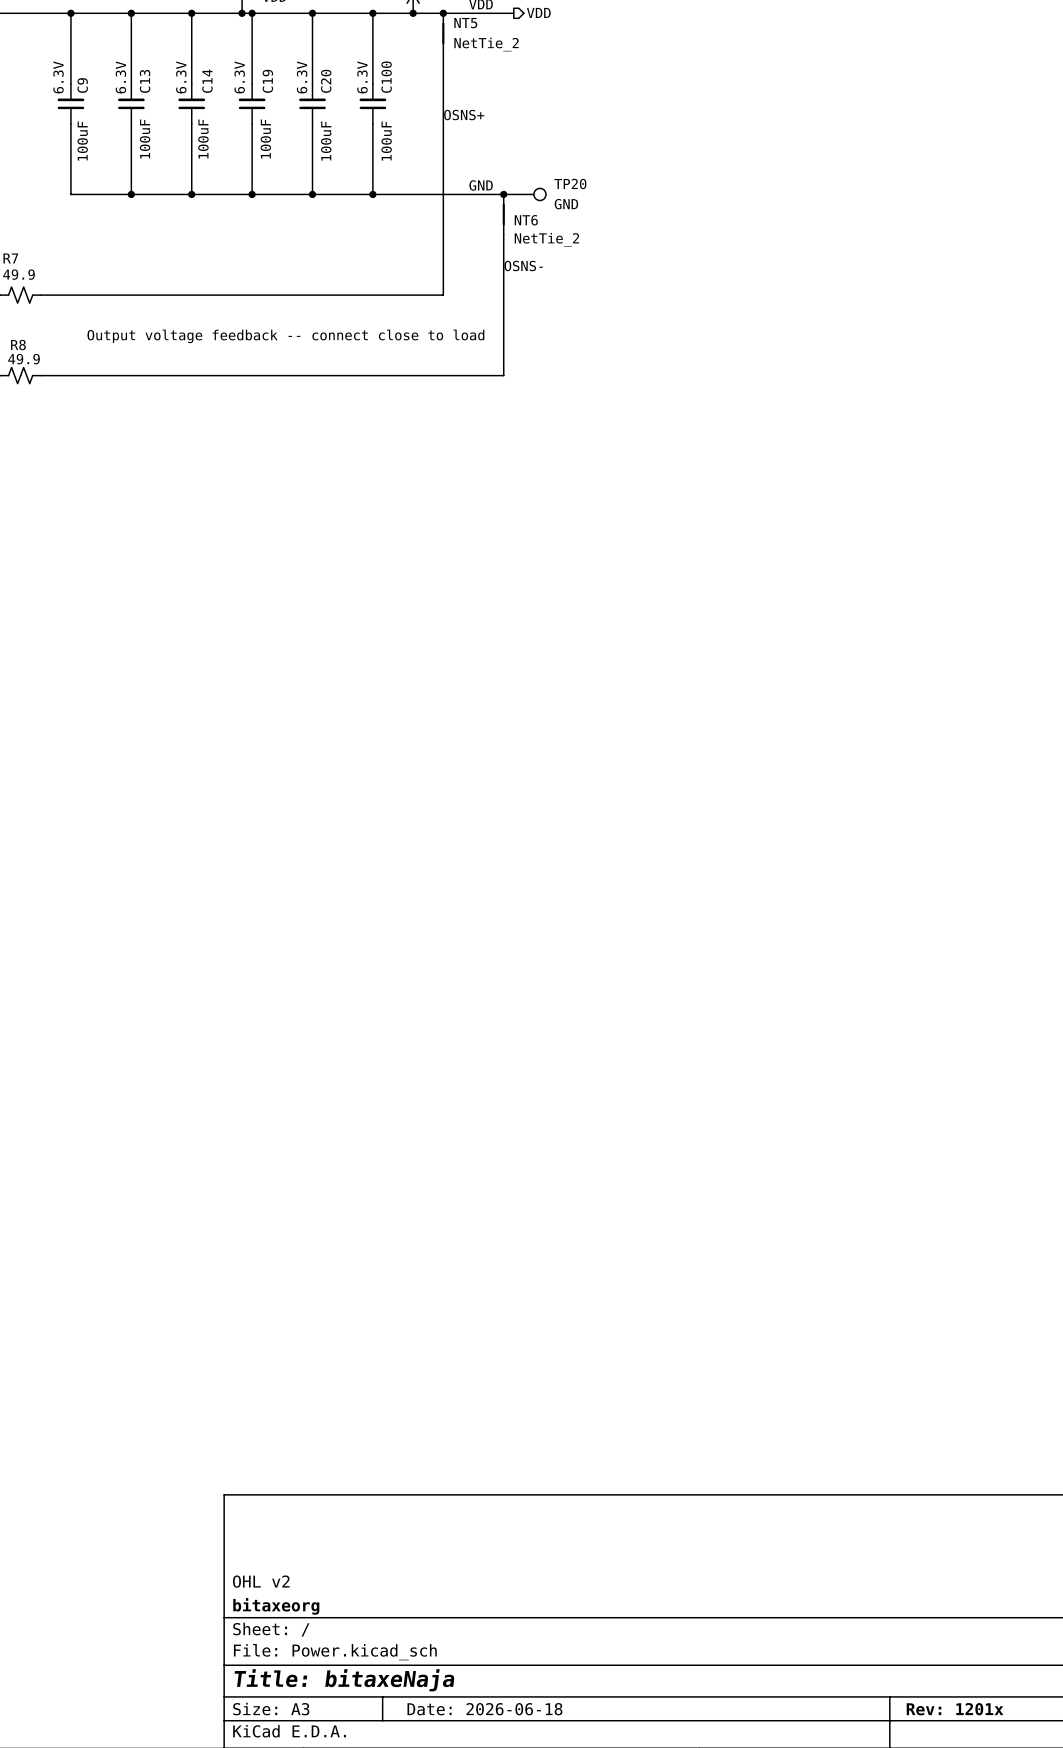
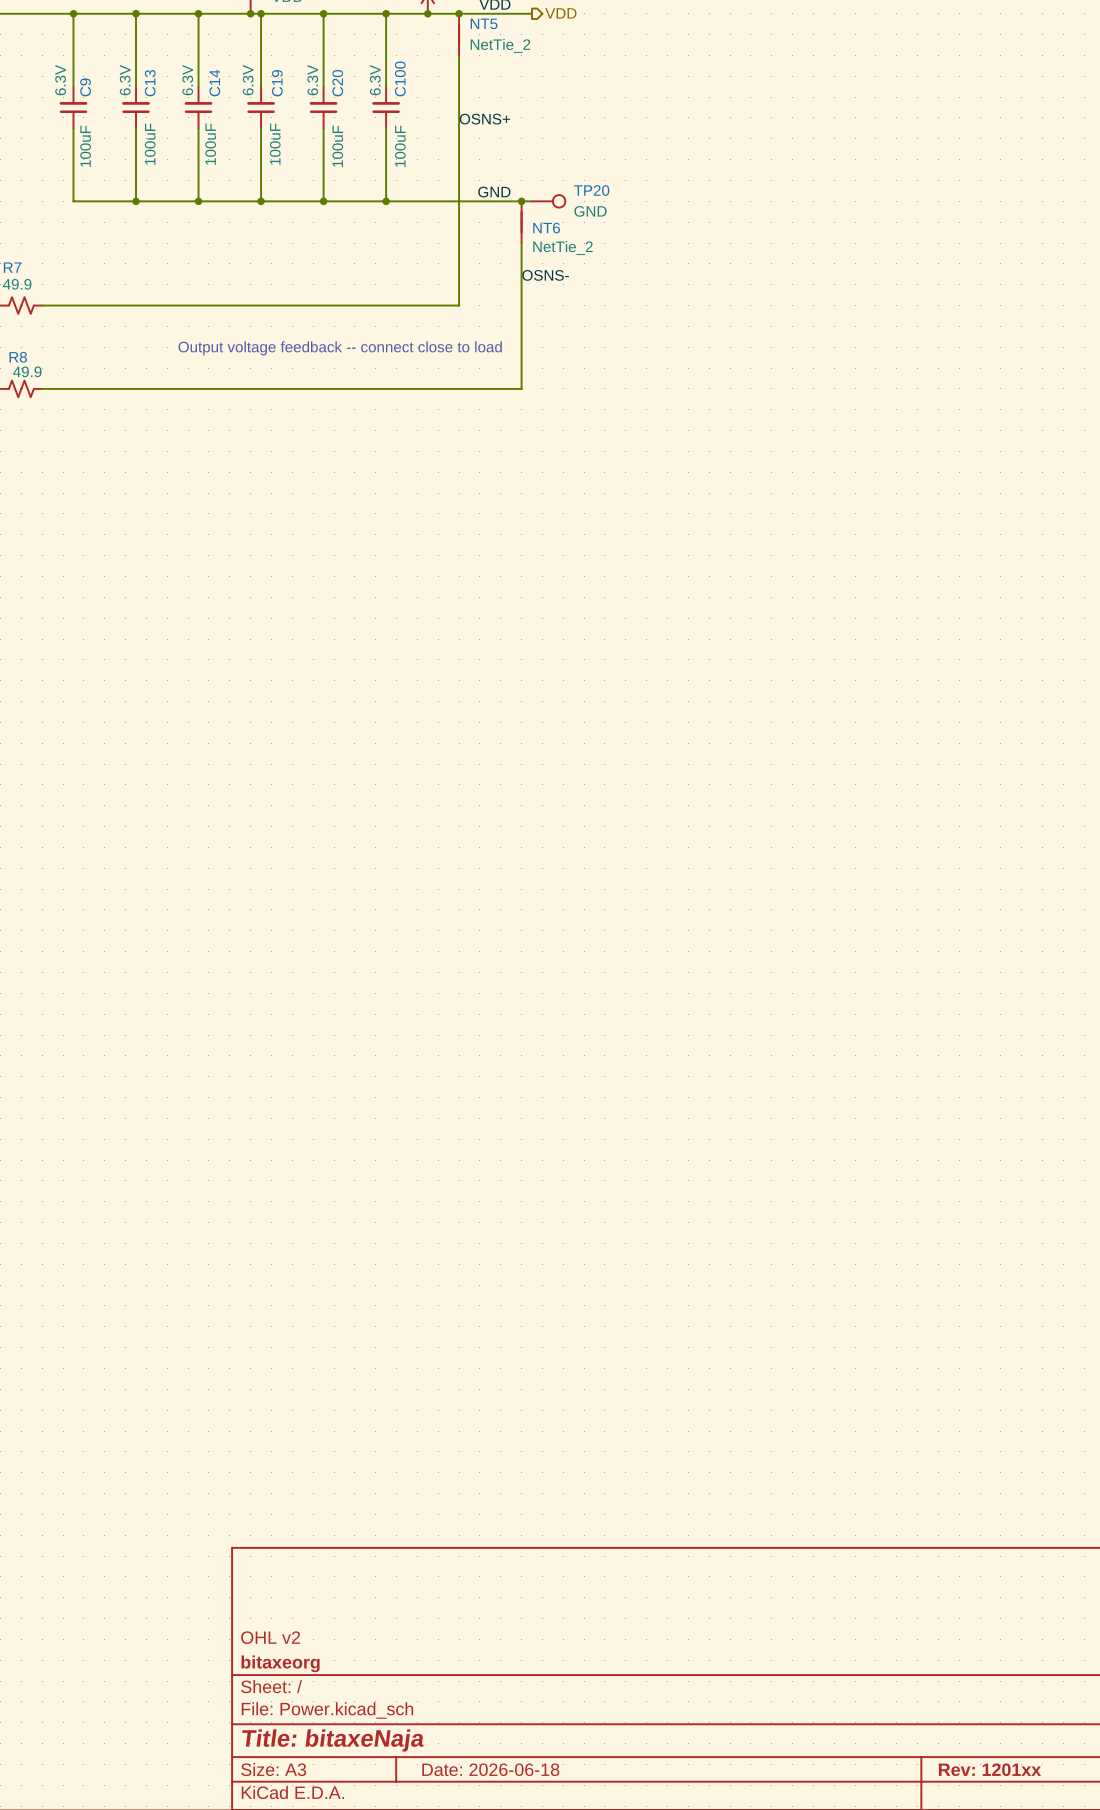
title block: Rev: 1201x (955, 1709) -> Rev: 1201xx (990, 1769)

